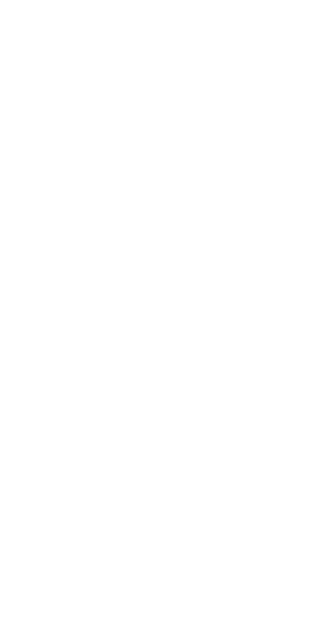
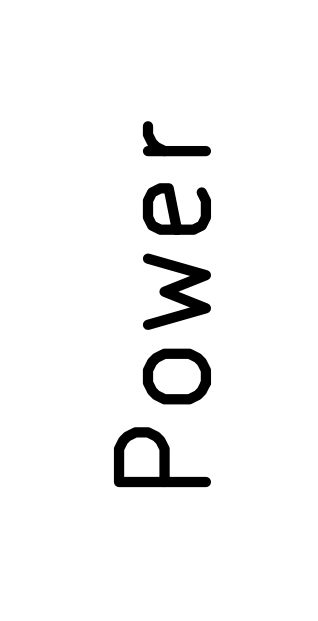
text: none -> Power (162, 304)

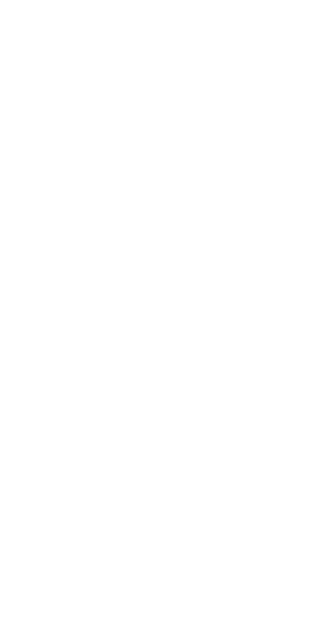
text: Power (162, 304) -> none

